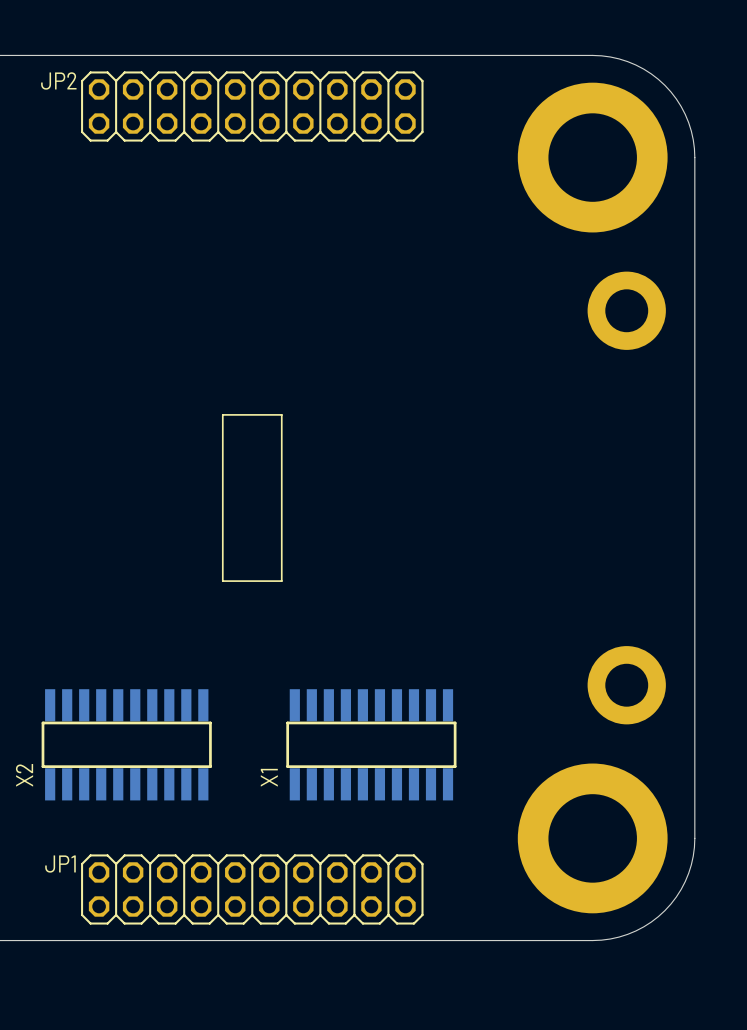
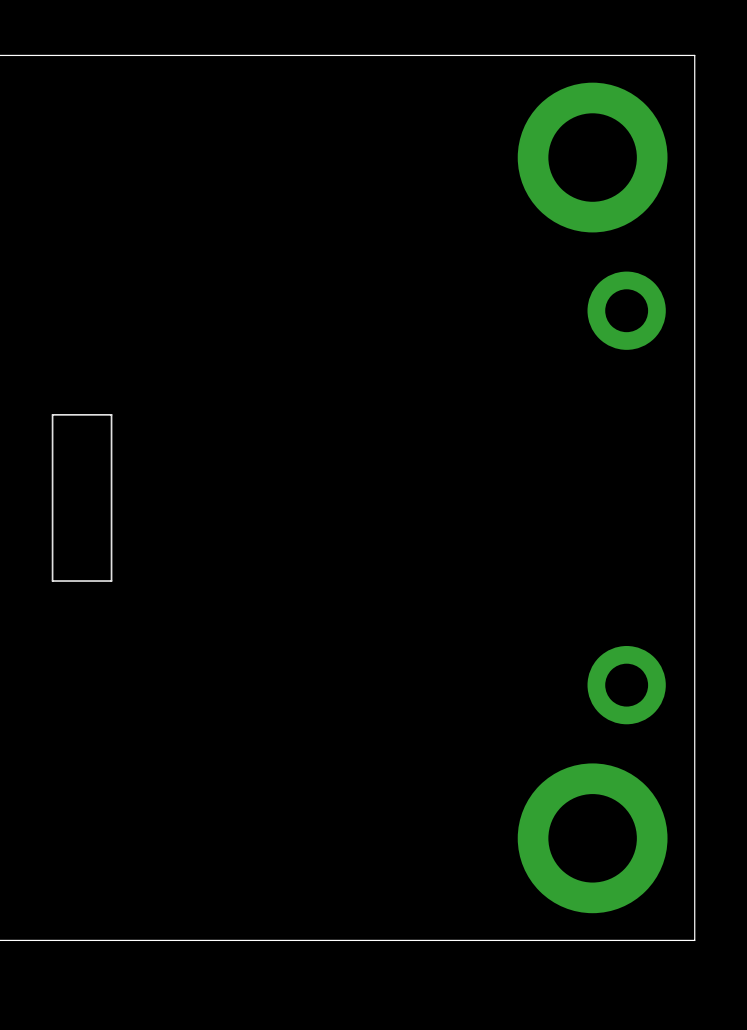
board edge: (592, 55) (619, 58) (635, 65) (651, 73) (664, 85) (676, 98) (685, 114) (691, 131) (694, 157) -> (592, 55) (694, 55) (694, 157)
JP2: (252, 106) -> none
part position: (252, 497) -> (82, 497)
X2: (126, 744) -> none
X1: (371, 744) -> none
board edge: (694, 838) (691, 864) (685, 881) (676, 897) (664, 910) (651, 922) (635, 930) (619, 937) (592, 940) -> (694, 838) (694, 940) (592, 940)
JP1: (252, 889) -> none

